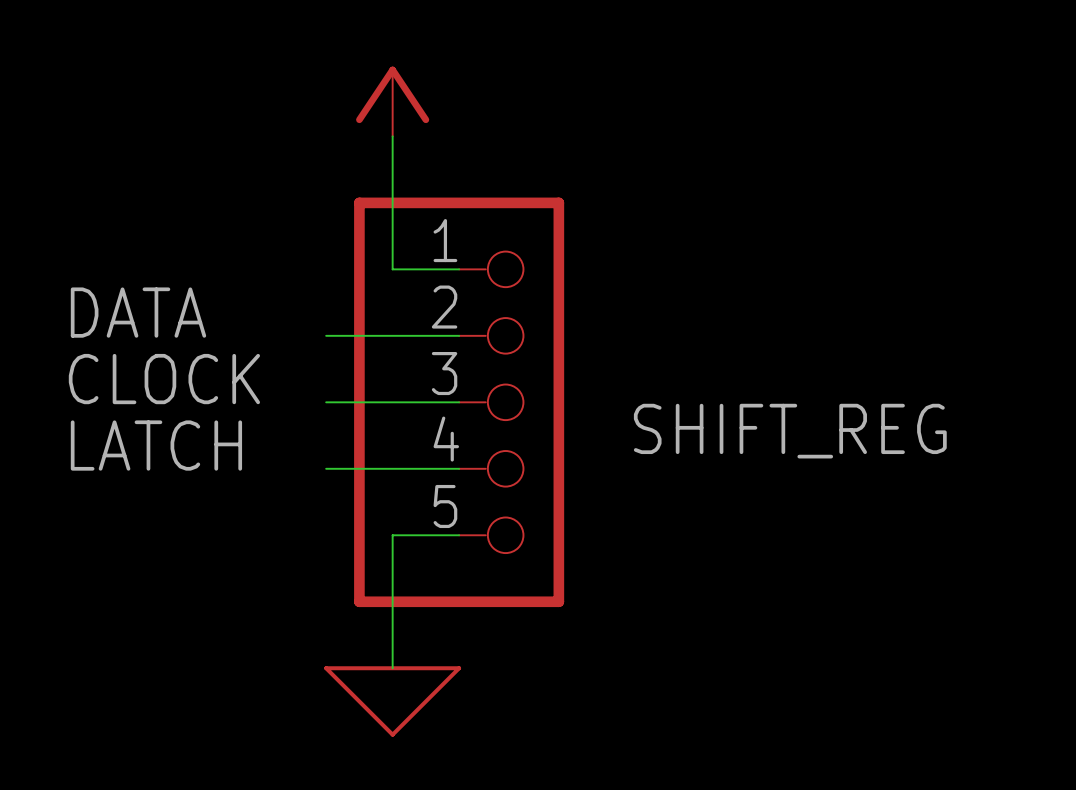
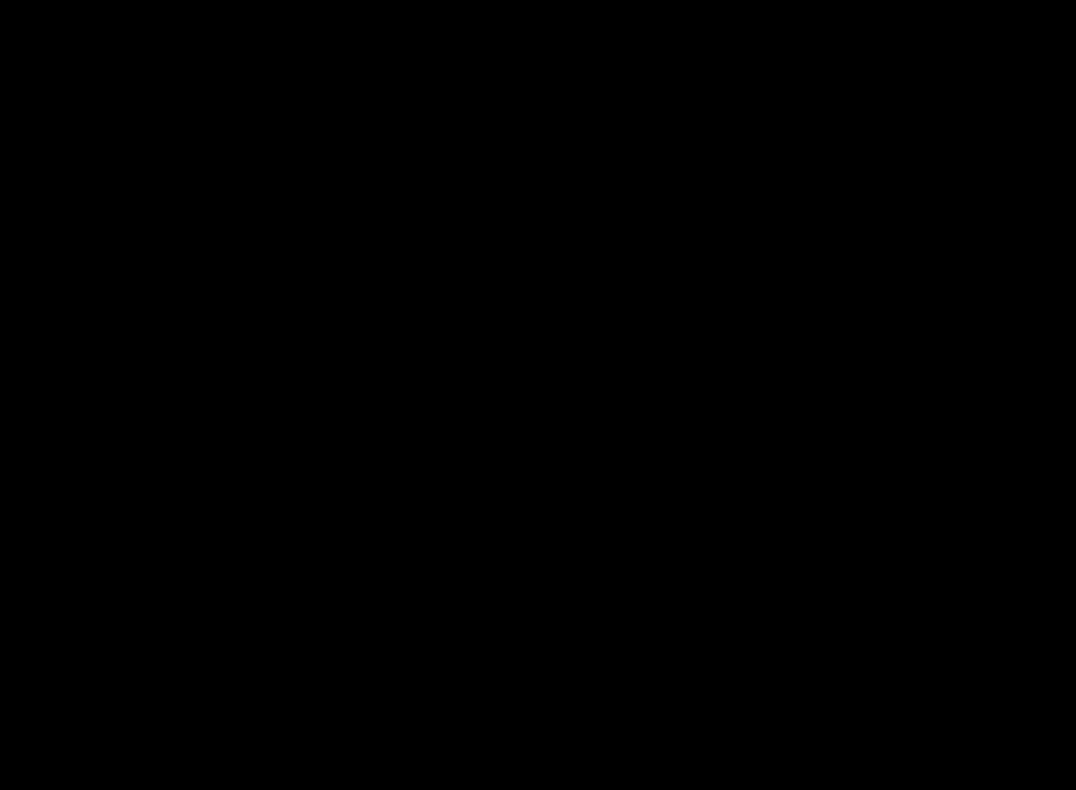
power symbol: (392, 101) -> none
wire: (392, 136) (392, 269) (459, 269) -> none
label: DATA (138, 312) -> none
wire: (326, 335) (459, 335) -> none
label: CLOCK (164, 379) -> none
wire: (326, 402) (459, 402) -> none
SHIFT_REG: (459, 402) -> none
label: LATCH (156, 445) -> none
wire: (326, 468) (459, 468) -> none
wire: (459, 535) (392, 535) (392, 668) -> none
power symbol: (392, 701) -> none

